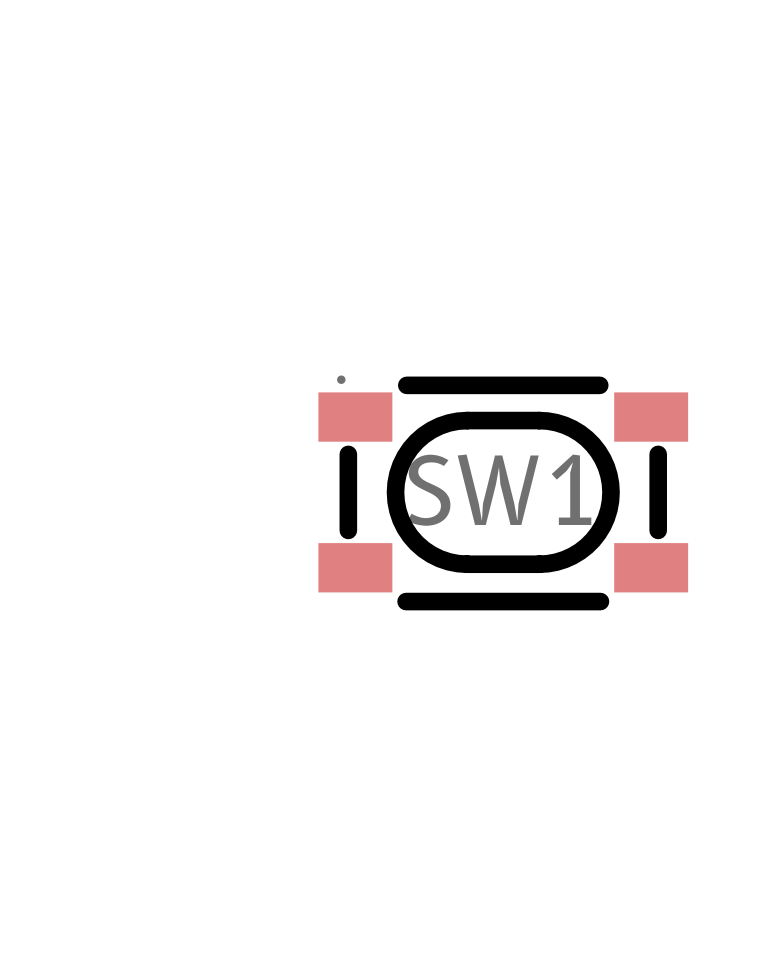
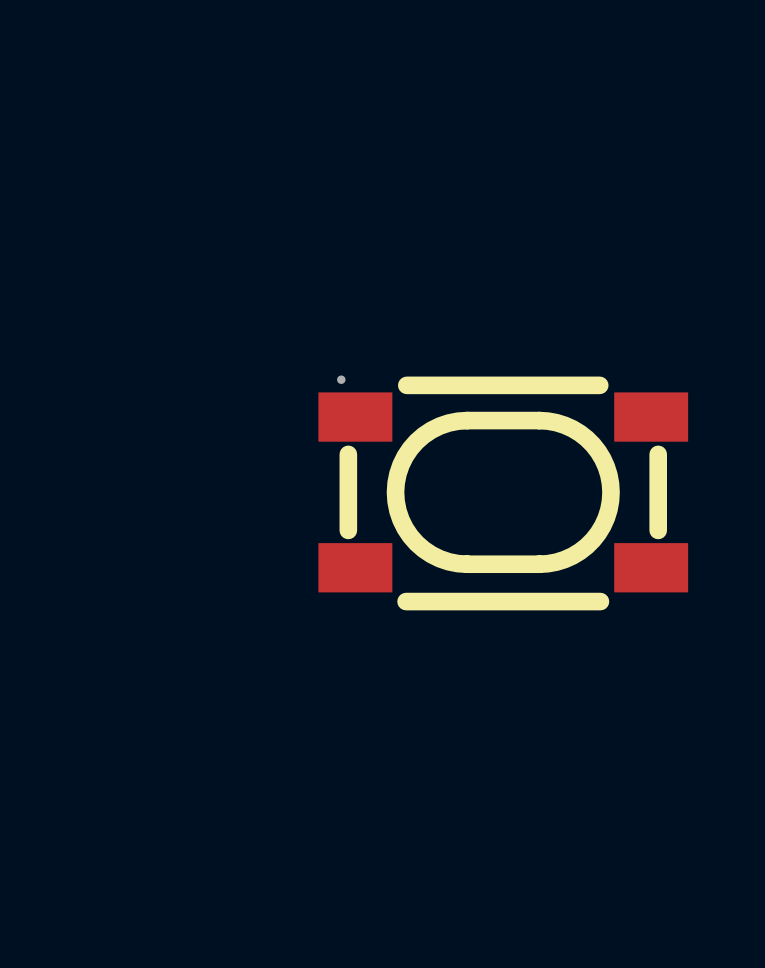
SW1 name: SW1 (499, 490) -> none

